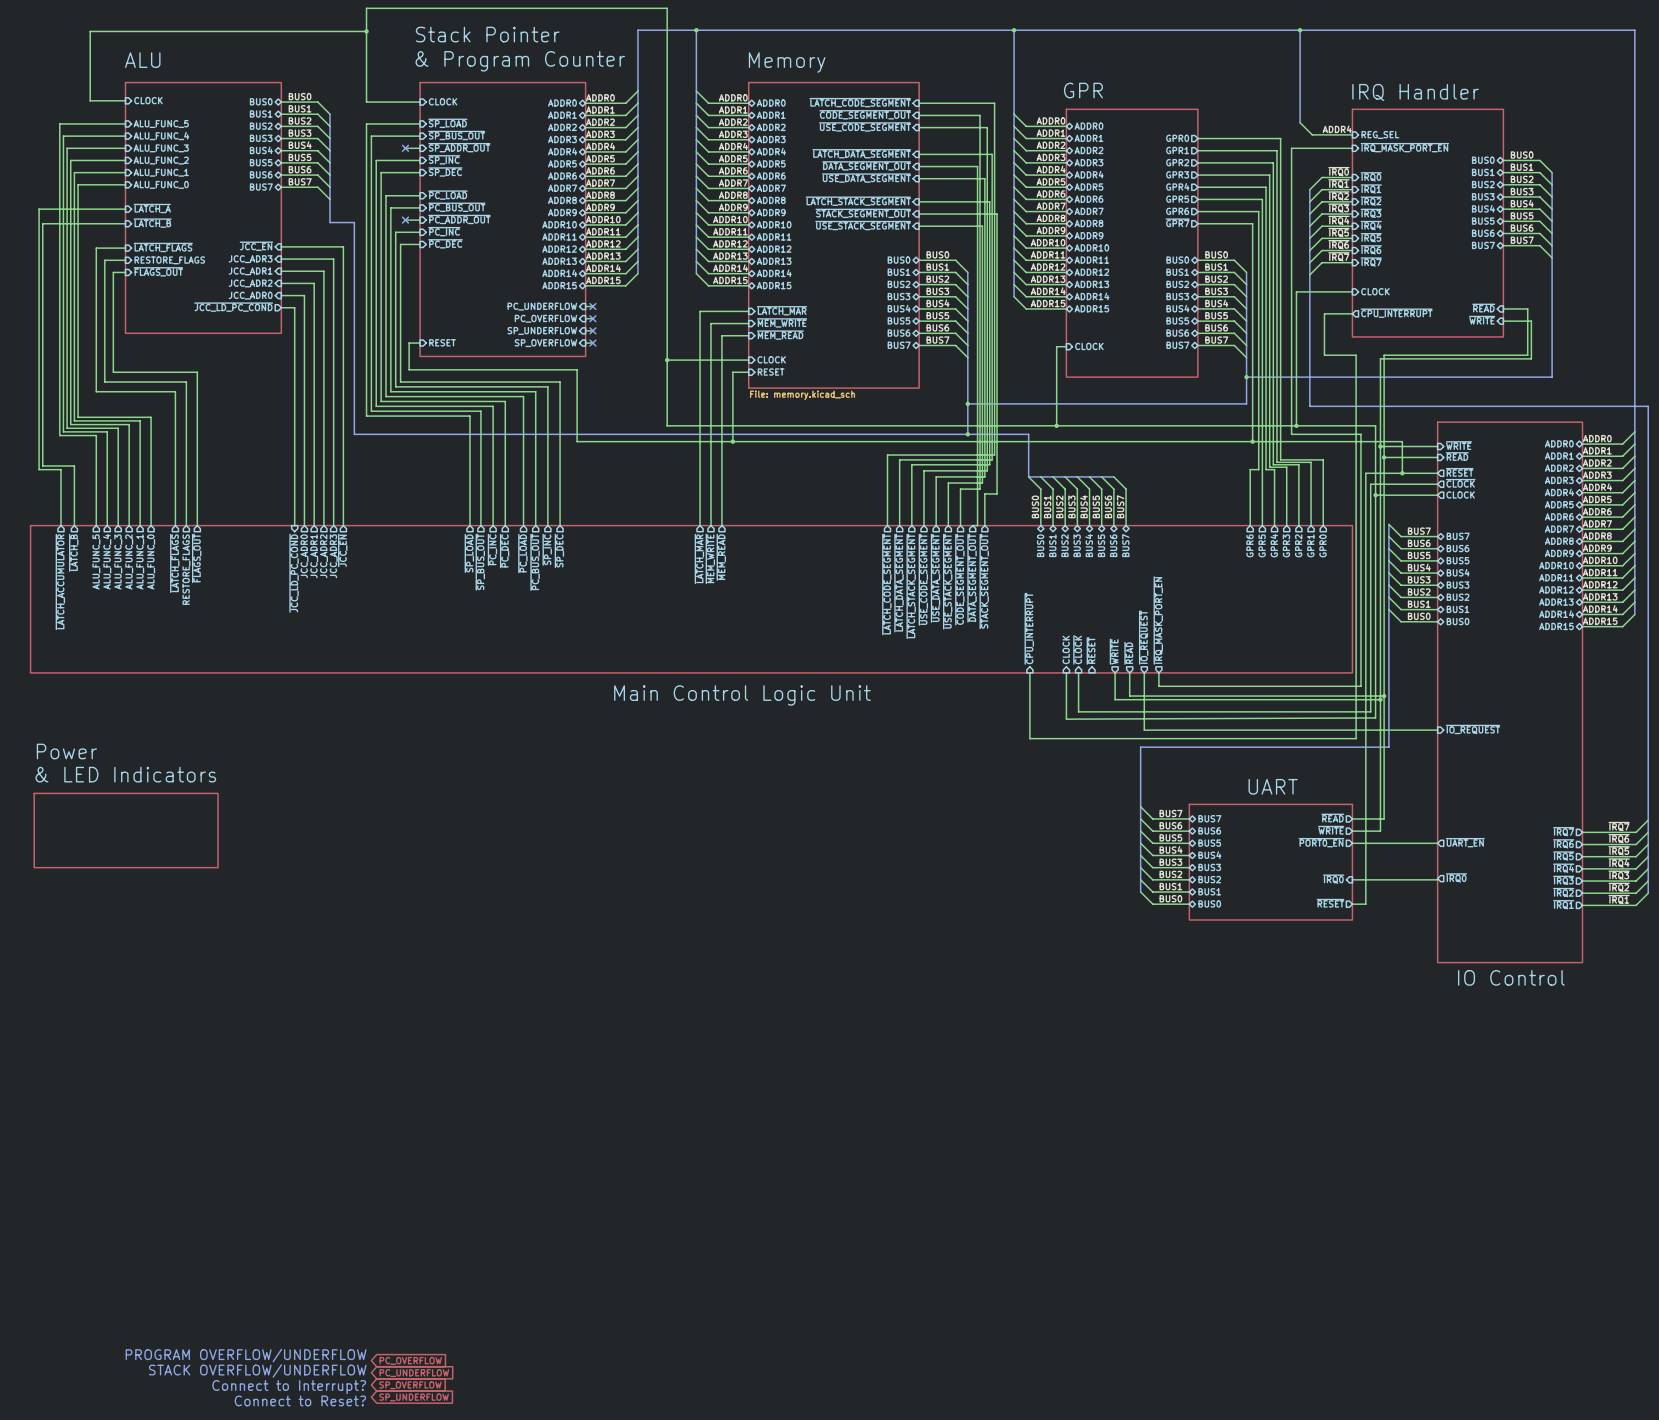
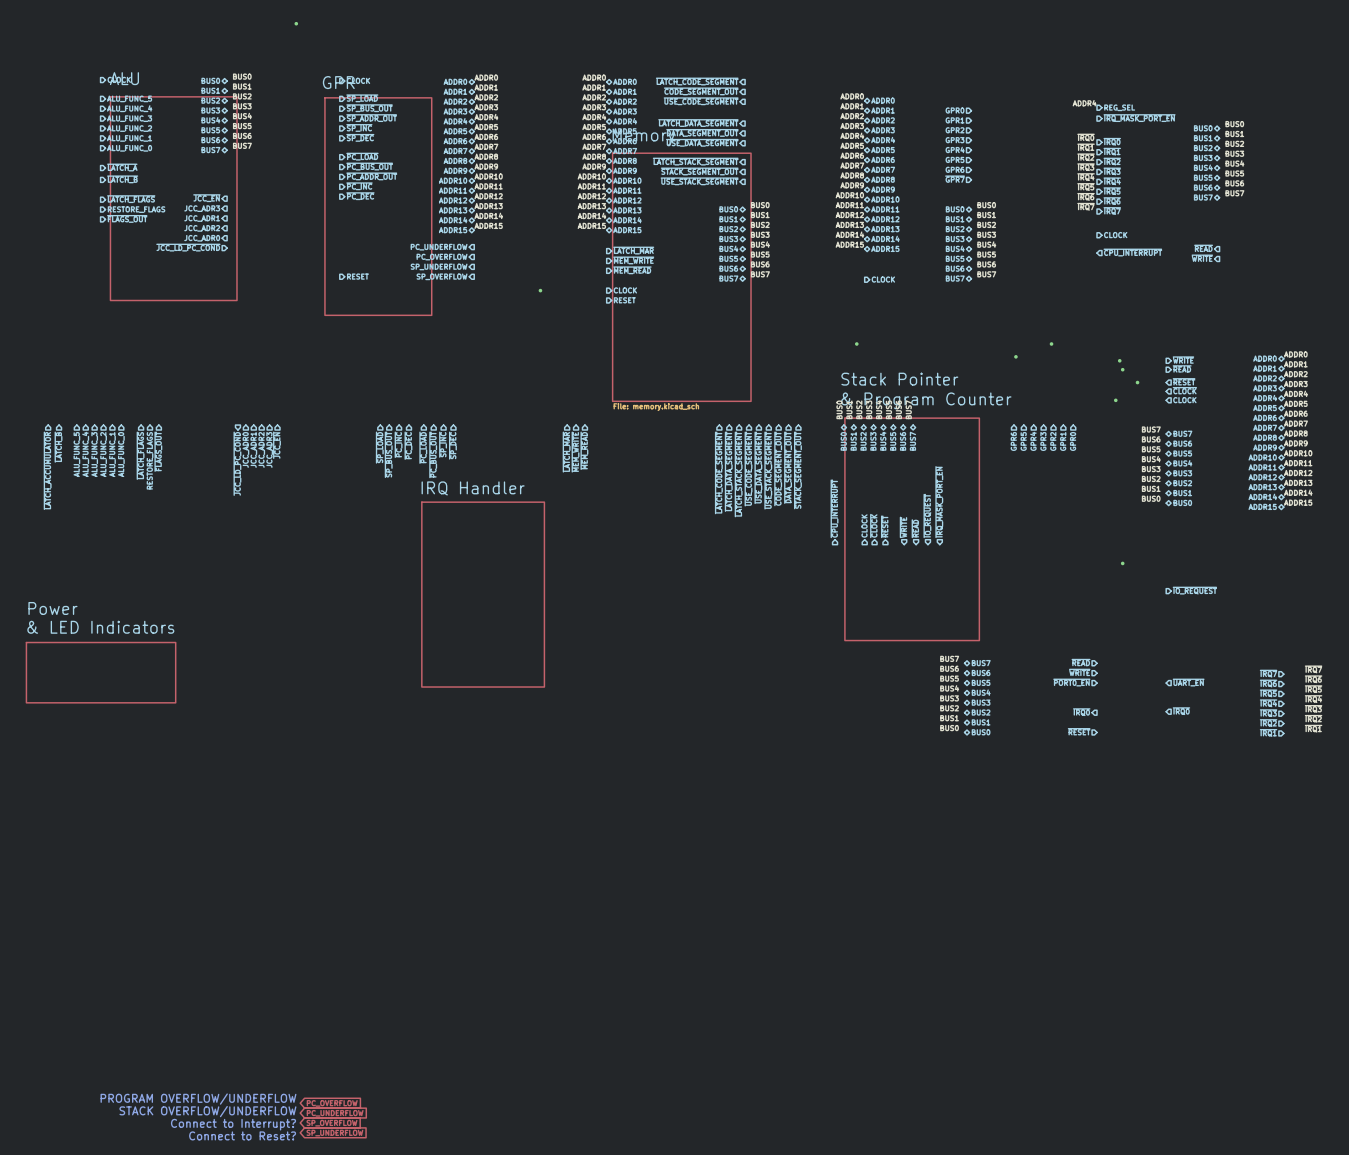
bus: (696, 30) (696, 273) -> none
junction: (696, 30) -> none
bus: (1014, 30) (1014, 296) -> none
junction: (1014, 30) -> none
bus: (1300, 30) (1300, 122) -> none
junction: (1300, 30) -> none
wire: (366, 31) (90, 31) (90, 100) (125, 100) -> none
wire: (637, 91) (625, 103) (585, 103) -> none
wire: (696, 91) (708, 103) (748, 103) -> none
wire: (281, 102) (317, 102) (330, 114) -> none
wire: (420, 102) (366, 102) (366, 8) (667, 8) (667, 425) (1375, 425) (1375, 717) (1066, 719) (1066, 672) -> none
wire: (637, 103) (625, 115) (585, 115) -> none
wire: (696, 103) (708, 115) (748, 115) -> none
wire: (919, 103) (994, 103) (994, 455) (887, 455) (887, 525) -> none
wire: (281, 114) (317, 114) (330, 126) -> none
bus: (330, 114) (330, 222) (354, 222) (354, 434) (1028, 434) (1028, 476) (1113, 476) -> none
wire: (1014, 114) (1026, 126) (1066, 126) -> none
wire: (637, 115) (625, 127) (585, 127) -> none
wire: (696, 115) (708, 127) (748, 127) -> none
wire: (919, 115) (979, 115) (979, 489) (960, 489) (960, 525) -> none
wire: (1300, 122) (1312, 134) (1352, 134) -> none
wire: (125, 123) (59, 123) (59, 435) (96, 435) (96, 525) -> none
wire: (420, 123) (366, 123) (366, 416) (469, 416) (469, 525) -> none
wire: (281, 126) (317, 126) (330, 138) -> none
wire: (1014, 126) (1026, 138) (1066, 138) -> none
wire: (637, 127) (625, 139) (585, 139) -> none
wire: (696, 127) (708, 139) (748, 139) -> none
wire: (919, 127) (987, 127) (987, 470) (923, 470) (923, 525) -> none
wire: (125, 136) (63, 136) (63, 431) (107, 431) (107, 525) -> none
wire: (420, 136) (371, 136) (371, 411) (480, 411) (480, 525) -> none
wire: (281, 138) (317, 138) (330, 150) -> none
wire: (1014, 138) (1026, 150) (1066, 150) -> none
wire: (1197, 138) (1280, 138) (1280, 459) (1323, 459) (1323, 525) -> none
wire: (637, 139) (625, 151) (585, 151) -> none
wire: (696, 139) (708, 151) (748, 151) -> none
wire: (125, 148) (67, 148) (67, 428) (118, 428) (118, 525) -> none
wire: (405, 148) (420, 148) -> none
no-connect mark: (405, 148) -> none
wire: (1352, 148) (1291, 148) (1291, 434) (1360, 434) (1360, 686) (1158, 686) (1158, 672) -> none
wire: (281, 150) (317, 150) (330, 162) -> none
wire: (1014, 150) (1026, 162) (1066, 162) -> none
wire: (1197, 150) (1276, 150) (1276, 462) (1311, 462) (1311, 525) -> none
wire: (637, 151) (625, 164) (585, 164) -> none
wire: (696, 151) (708, 164) (748, 164) -> none
wire: (919, 154) (992, 154) (992, 459) (899, 459) (899, 525) -> none
wire: (125, 160) (70, 160) (70, 424) (129, 424) (129, 525) -> none
wire: (420, 160) (376, 160) (376, 406) (493, 406) (493, 525) -> none
wire: (1503, 160) (1539, 160) (1552, 172) -> none
wire: (281, 162) (317, 162) (330, 175) -> none
wire: (1014, 162) (1026, 175) (1066, 175) -> none
wire: (1197, 162) (1273, 162) (1273, 464) (1298, 464) (1298, 525) -> none
wire: (637, 164) (625, 176) (585, 176) -> none
wire: (696, 164) (708, 176) (748, 176) -> none
wire: (919, 166) (977, 166) (977, 525) (972, 525) -> none
wire: (125, 172) (74, 172) (74, 420) (140, 420) (140, 525) -> none
wire: (420, 172) (381, 172) (381, 401) (505, 401) (505, 525) -> none
wire: (1503, 172) (1539, 172) (1552, 184) -> none
bus: (1552, 172) (1552, 377) (1246, 377) -> none
wire: (281, 175) (317, 175) (330, 187) -> none
wire: (1014, 175) (1026, 187) (1066, 187) -> none
wire: (1197, 175) (1269, 175) (1269, 467) (1286, 467) (1286, 525) -> none
wire: (637, 176) (625, 188) (585, 188) -> none
wire: (696, 176) (708, 188) (748, 188) -> none
wire: (1352, 177) (1322, 177) (1309, 189) -> none
wire: (919, 178) (984, 178) (984, 476) (936, 476) (936, 525) -> none
wire: (125, 184) (78, 184) (78, 417) (151, 417) (151, 525) -> none
wire: (1503, 184) (1539, 184) (1552, 196) -> none
wire: (281, 187) (317, 187) (330, 199) -> none
wire: (1014, 187) (1026, 199) (1066, 199) -> none
wire: (1197, 187) (1266, 187) (1266, 469) (1274, 469) (1274, 525) -> none
wire: (637, 188) (625, 200) (585, 200) -> none
wire: (696, 188) (708, 200) (748, 200) -> none
bus: (1309, 189) (1309, 406) (1648, 406) (1648, 893) -> none
wire: (1352, 189) (1322, 189) (1309, 201) -> none
wire: (420, 195) (385, 195) (385, 396) (523, 396) (523, 525) -> none
wire: (1503, 196) (1539, 196) (1552, 209) -> none
wire: (1014, 199) (1026, 211) (1066, 211) -> none
wire: (1197, 199) (1262, 199) (1262, 525) -> none
wire: (637, 200) (625, 212) (585, 212) -> none
wire: (696, 200) (708, 212) (748, 212) -> none
wire: (919, 201) (989, 201) (989, 464) (911, 464) (911, 525) -> none
wire: (1352, 201) (1322, 201) (1309, 214) -> none
sheet position: (203, 207) -> (173, 198)
wire: (420, 207) (390, 207) (390, 391) (535, 391) (535, 525) -> none
wire: (125, 209) (39, 209) (39, 469) (61, 469) (61, 525) -> none
wire: (1503, 209) (1539, 209) (1552, 221) -> none
wire: (1014, 211) (1026, 223) (1066, 223) -> none
wire: (1197, 211) (1258, 211) (1258, 469) (1250, 469) (1250, 525) -> none
wire: (637, 212) (625, 224) (585, 224) -> none
wire: (696, 212) (708, 224) (748, 224) -> none
wire: (919, 214) (997, 214) (997, 493) (984, 493) (984, 525) -> none
wire: (1352, 214) (1322, 214) (1309, 226) -> none
sheet: (502, 219) -> none
wire: (405, 220) (420, 220) -> none
no-connect mark: (405, 220) -> none
wire: (1503, 221) (1539, 221) (1552, 233) -> none
wire: (125, 223) (42, 223) (42, 465) (74, 465) (74, 525) -> none
wire: (1014, 223) (1026, 235) (1066, 235) -> none
wire: (1197, 223) (1252, 223) (1252, 441) -> none
sheet: (1427, 223) -> none
wire: (637, 224) (625, 237) (585, 237) -> none
wire: (696, 224) (708, 237) (748, 237) -> none
wire: (919, 226) (982, 226) (982, 483) (948, 483) (948, 525) -> none
wire: (1352, 226) (1322, 226) (1309, 238) -> none
wire: (420, 232) (395, 232) (395, 386) (547, 386) (547, 525) -> none
wire: (1503, 233) (1539, 233) (1552, 245) -> none
sheet position: (833, 235) -> (681, 277)
wire: (1014, 235) (1026, 248) (1066, 248) -> none
wire: (637, 237) (625, 249) (585, 249) -> none
wire: (696, 237) (708, 249) (748, 249) -> none
wire: (1352, 238) (1322, 238) (1309, 250) -> none
sheet: (1132, 243) -> none
wire: (420, 244) (400, 244) (400, 381) (560, 381) (560, 525) -> none
wire: (1503, 245) (1539, 245) (1552, 257) -> none
wire: (281, 246) (343, 246) (343, 525) -> none
wire: (125, 248) (96, 248) (96, 391) (175, 391) (175, 525) -> none
wire: (1014, 248) (1026, 260) (1066, 260) -> none
wire: (637, 249) (625, 261) (585, 261) -> none
wire: (696, 249) (708, 261) (748, 261) -> none
wire: (1352, 250) (1322, 250) (1309, 262) -> none
sheet: none -> (378, 206)
wire: (281, 259) (333, 259) (333, 525) -> none
wire: (125, 260) (104, 260) (104, 381) (186, 381) (186, 525) -> none
wire: (919, 260) (955, 260) (967, 272) -> none
wire: (1014, 260) (1026, 272) (1066, 272) -> none
wire: (1197, 260) (1234, 260) (1246, 272) -> none
wire: (637, 261) (625, 273) (585, 273) -> none
wire: (696, 261) (708, 273) (748, 273) -> none
wire: (1352, 262) (1322, 262) (1309, 274) -> none
wire: (281, 271) (323, 271) (323, 525) -> none
wire: (125, 272) (113, 272) (113, 372) (197, 372) (197, 525) -> none
wire: (919, 272) (955, 272) (967, 284) -> none
bus: (967, 272) (967, 434) -> none
wire: (1014, 272) (1026, 284) (1066, 284) -> none
wire: (1197, 272) (1234, 272) (1246, 284) -> none
bus: (1246, 272) (1246, 403) (967, 403) -> none
wire: (637, 273) (625, 285) (585, 285) -> none
bus: (637, 273) (637, 30) (1634, 30) (1634, 614) -> none
wire: (696, 273) (708, 285) (748, 285) -> none
wire: (281, 283) (314, 283) (314, 525) -> none
wire: (919, 284) (955, 284) (967, 296) -> none
wire: (1014, 284) (1026, 296) (1066, 296) -> none
wire: (1197, 284) (1234, 284) (1246, 296) -> none
wire: (1352, 291) (1296, 291) (1296, 425) -> none
wire: (281, 295) (304, 295) (304, 525) -> none
wire: (919, 296) (955, 296) (967, 308) -> none
wire: (1014, 296) (1026, 308) (1066, 308) -> none
wire: (1197, 296) (1234, 296) (1246, 308) -> none
wire: (585, 306) (592, 306) -> none
no-connect mark: (592, 306) -> none
wire: (281, 307) (294, 307) (294, 525) -> none
wire: (919, 308) (955, 308) (967, 321) -> none
wire: (1197, 308) (1234, 308) (1246, 321) -> none
wire: (1503, 308) (1527, 308) (1527, 355) (1384, 355) (1384, 818) (1352, 818) -> none
wire: (748, 311) (700, 311) (700, 525) -> none
wire: (1352, 313) (1324, 313) (1324, 355) (1356, 355) (1356, 738) (1029, 738) (1029, 672) -> none
wire: (585, 318) (592, 318) -> none
no-connect mark: (592, 318) -> none
wire: (919, 321) (955, 321) (967, 333) -> none
wire: (1197, 321) (1234, 321) (1246, 333) -> none
wire: (1503, 321) (1531, 321) (1531, 358) (1380, 358) (1380, 831) (1352, 831) -> none
wire: (748, 323) (710, 323) (710, 525) -> none
wire: (585, 330) (592, 330) -> none
no-connect mark: (592, 330) -> none
wire: (919, 333) (955, 333) (967, 345) -> none
wire: (1197, 333) (1234, 333) (1246, 345) -> none
wire: (748, 335) (721, 335) (721, 525) -> none
wire: (420, 343) (409, 343) (409, 369) (577, 369) (577, 441) (1402, 441) (1402, 473) -> none
wire: (585, 343) (592, 343) -> none
no-connect mark: (592, 343) -> none
wire: (919, 345) (955, 345) (967, 357) -> none
wire: (1197, 345) (1234, 345) (1246, 357) -> none
wire: (1066, 346) (1056, 346) (1056, 425) -> none
wire: (667, 360) (748, 360) -> none
wire: (748, 372) (732, 372) (732, 441) -> none
junction: (1246, 377) -> none
junction: (967, 403) -> none
wire: (1634, 431) (1622, 444) (1582, 444) -> none
junction: (967, 434) -> none
junction: (732, 441) -> none
wire: (1634, 444) (1622, 456) (1582, 456) -> none
wire: (1380, 446) (1437, 446) -> none
wire: (1634, 456) (1622, 468) (1582, 468) -> none
wire: (1384, 457) (1437, 457) -> none
wire: (1634, 468) (1622, 480) (1582, 480) -> none
wire: (1437, 473) (1365, 473) (1365, 904) (1352, 904) -> none
wire: (1028, 476) (1040, 489) (1040, 525) -> none
wire: (1040, 476) (1053, 489) (1053, 525) -> none
wire: (1053, 476) (1065, 489) (1065, 525) -> none
wire: (1065, 476) (1077, 489) (1077, 525) -> none
wire: (1077, 476) (1089, 489) (1089, 525) -> none
wire: (1089, 476) (1101, 489) (1101, 525) -> none
wire: (1101, 476) (1113, 489) (1113, 525) -> none
wire: (1113, 476) (1126, 489) (1126, 525) -> none
wire: (1634, 480) (1622, 492) (1582, 492) -> none
wire: (1437, 484) (1370, 484) (1370, 711) (1078, 711) (1078, 672) -> none
wire: (1634, 492) (1622, 504) (1582, 504) -> none
wire: (1375, 495) (1437, 495) -> none
wire: (1634, 504) (1622, 517) (1582, 517) -> none
wire: (1634, 517) (1622, 529) (1582, 529) -> none
wire: (1388, 524) (1401, 536) (1437, 536) -> none
bus: (1388, 524) (1388, 747) (1140, 747) (1140, 892) -> none
wire: (1634, 529) (1622, 541) (1582, 541) -> none
wire: (1388, 536) (1401, 548) (1437, 548) -> none
wire: (1634, 541) (1622, 553) (1582, 553) -> none
wire: (1388, 548) (1401, 560) (1437, 560) -> none
wire: (1634, 553) (1622, 565) (1582, 565) -> none
wire: (1388, 560) (1401, 573) (1437, 573) -> none
wire: (1634, 565) (1622, 577) (1582, 577) -> none
wire: (1388, 573) (1401, 585) (1437, 585) -> none
wire: (1634, 577) (1622, 590) (1582, 590) -> none
wire: (1388, 585) (1401, 597) (1437, 597) -> none
wire: (1634, 590) (1622, 602) (1582, 602) -> none
wire: (1388, 597) (1401, 609) (1437, 609) -> none
sheet: (691, 599) -> none
wire: (1634, 602) (1622, 614) (1582, 614) -> none
wire: (1388, 609) (1401, 621) (1437, 621) -> none
wire: (1634, 614) (1622, 626) (1582, 626) -> none
sheet: none -> (912, 529)
wire: (1115, 672) (1115, 699) (1380, 699) -> none
wire: (1129, 672) (1129, 696) (1384, 696) -> none
wire: (1144, 672) (1144, 730) (1437, 730) -> none
sheet: (1510, 692) -> none
junction: (1380, 699) -> none
sheet: none -> (483, 594)
wire: (1140, 806) (1152, 818) (1189, 818) -> none
wire: (1140, 818) (1152, 831) (1189, 831) -> none
wire: (1648, 820) (1636, 832) (1582, 832) -> none
wire: (1140, 831) (1152, 843) (1189, 843) -> none
wire: (1648, 832) (1636, 844) (1582, 844) -> none
wire: (1140, 843) (1152, 855) (1189, 855) -> none
wire: (1352, 843) (1437, 843) -> none
wire: (1648, 844) (1636, 856) (1582, 856) -> none
wire: (1140, 855) (1152, 867) (1189, 867) -> none
wire: (1648, 856) (1636, 868) (1582, 868) -> none
sheet: (1270, 862) -> none
wire: (1140, 867) (1152, 879) (1189, 879) -> none
wire: (1648, 868) (1636, 881) (1582, 881) -> none
wire: (1140, 879) (1152, 892) (1189, 892) -> none
wire: (1352, 879) (1437, 879) -> none
wire: (1648, 881) (1636, 893) (1582, 893) -> none
wire: (1140, 892) (1152, 904) (1189, 904) -> none
wire: (1648, 893) (1636, 905) (1582, 905) -> none

